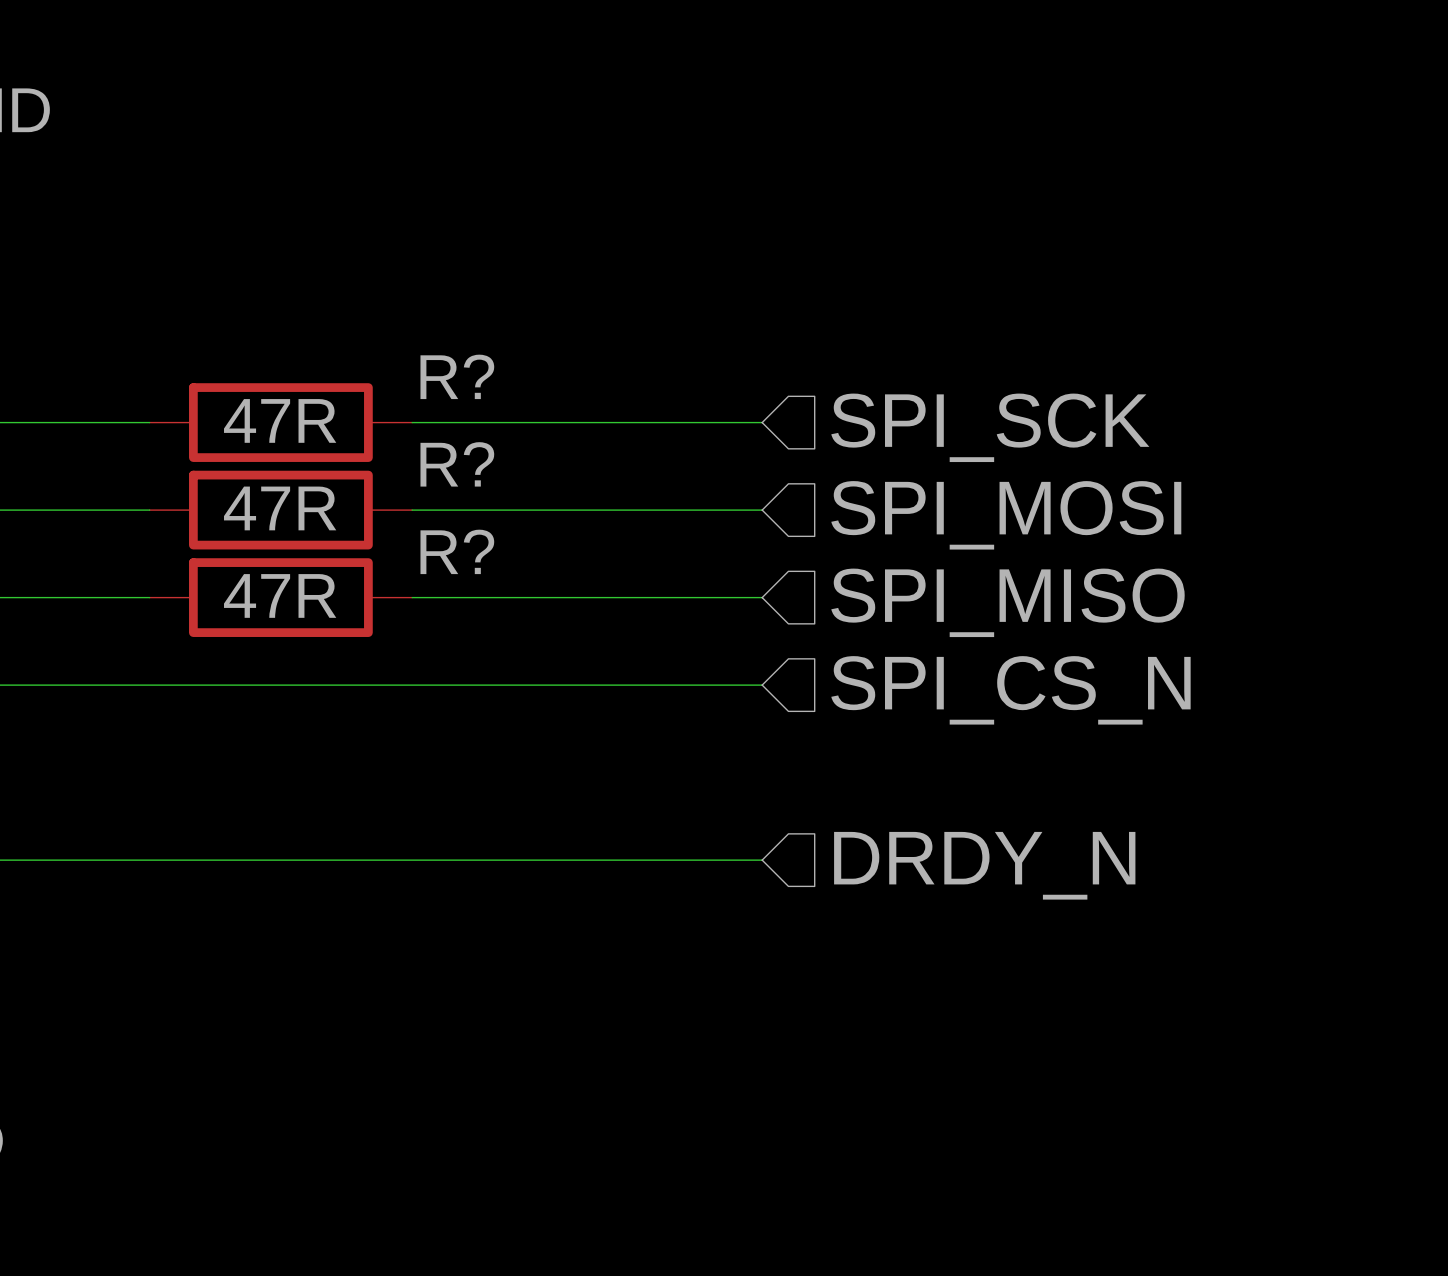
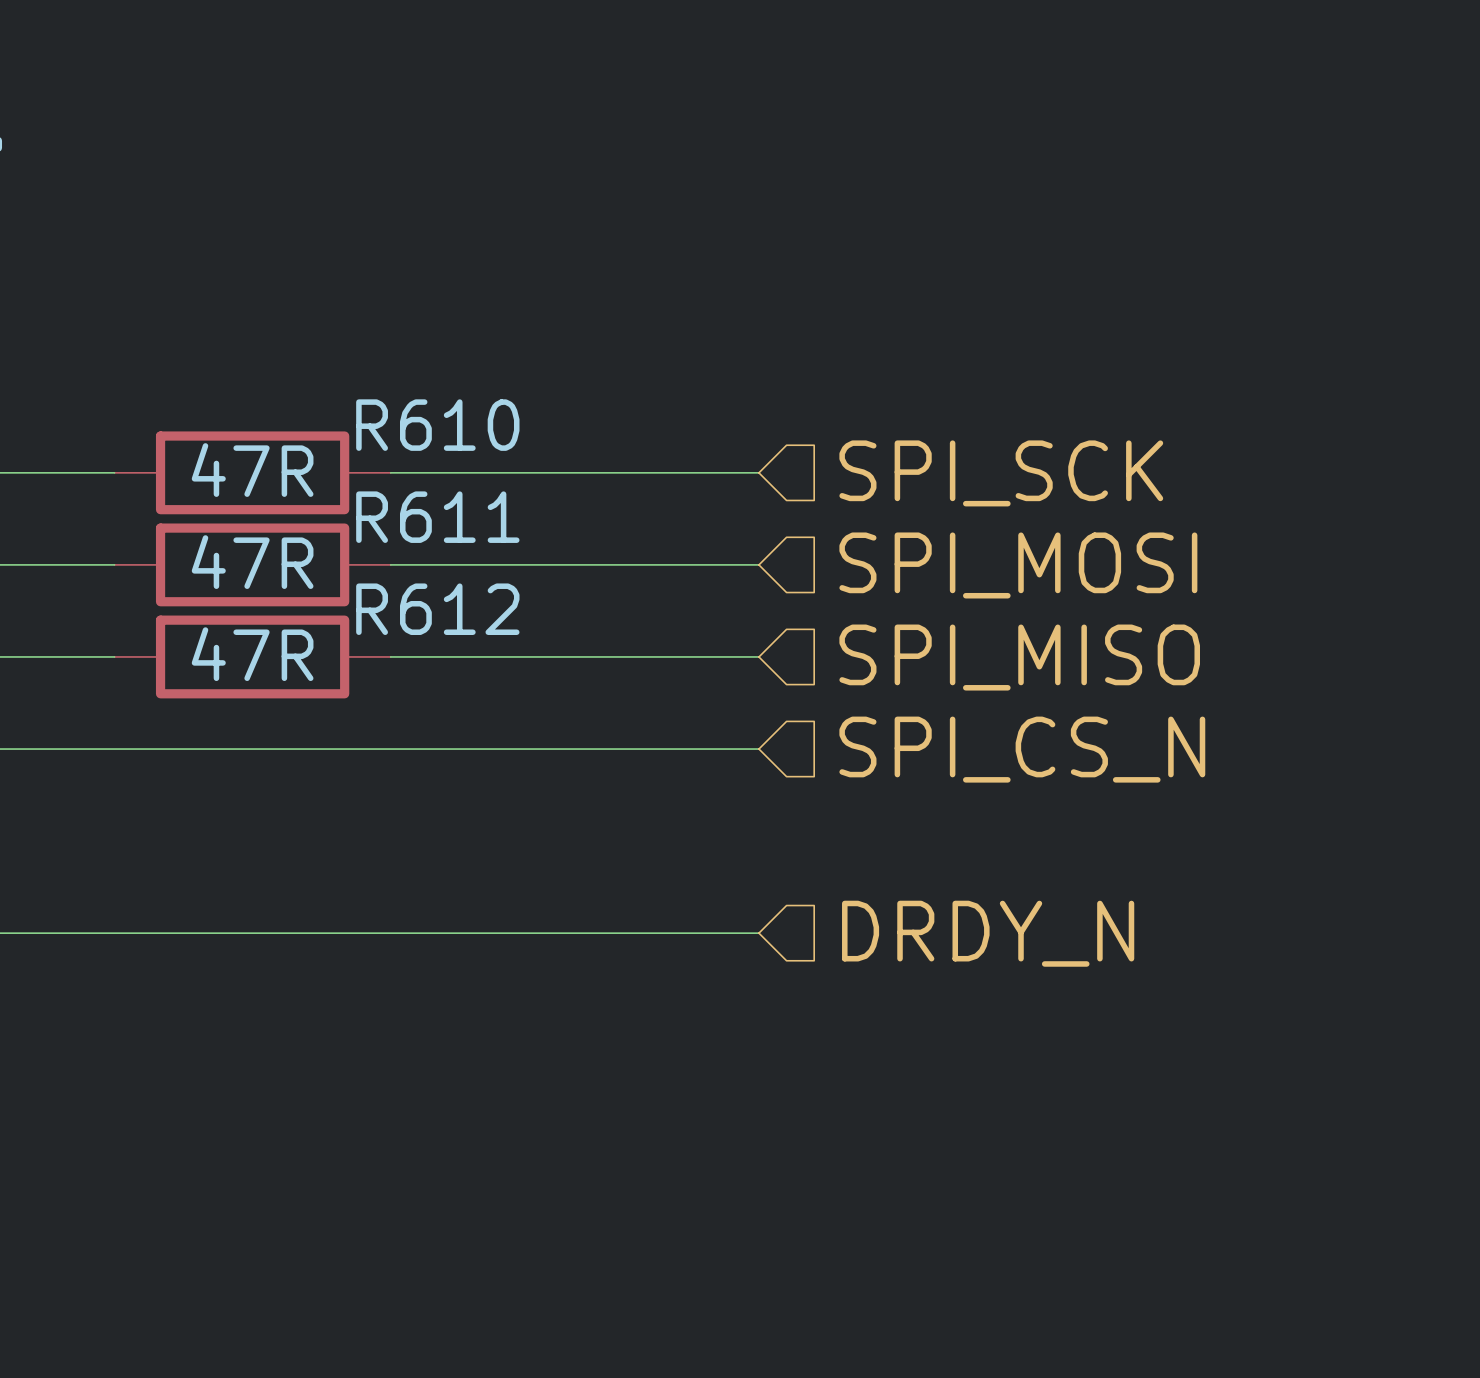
R? name: R? (457, 376) -> R610 (437, 425)
R? name: R? (457, 464) -> R611 (437, 517)
R? name: R? (457, 551) -> R612 (437, 609)

